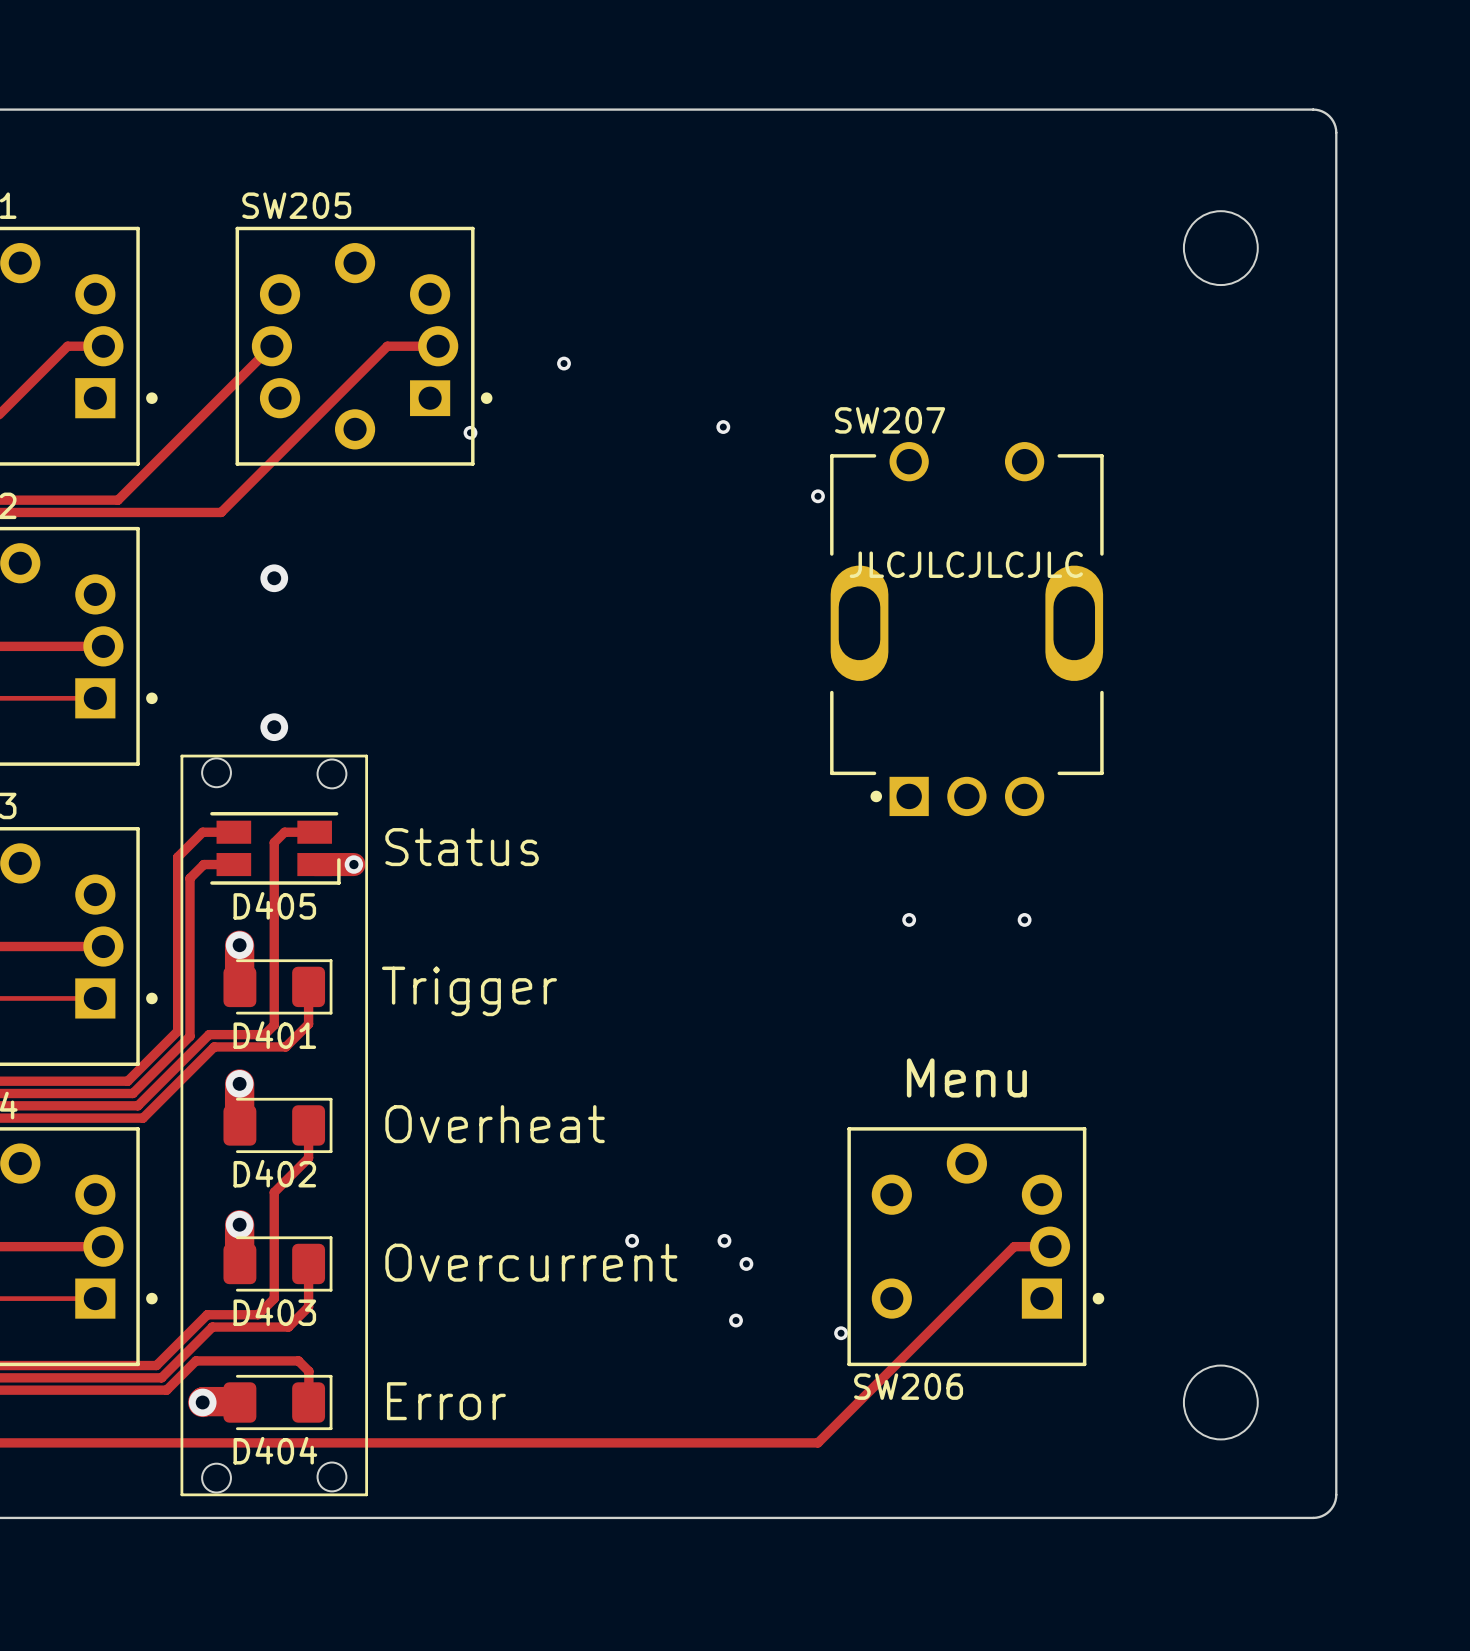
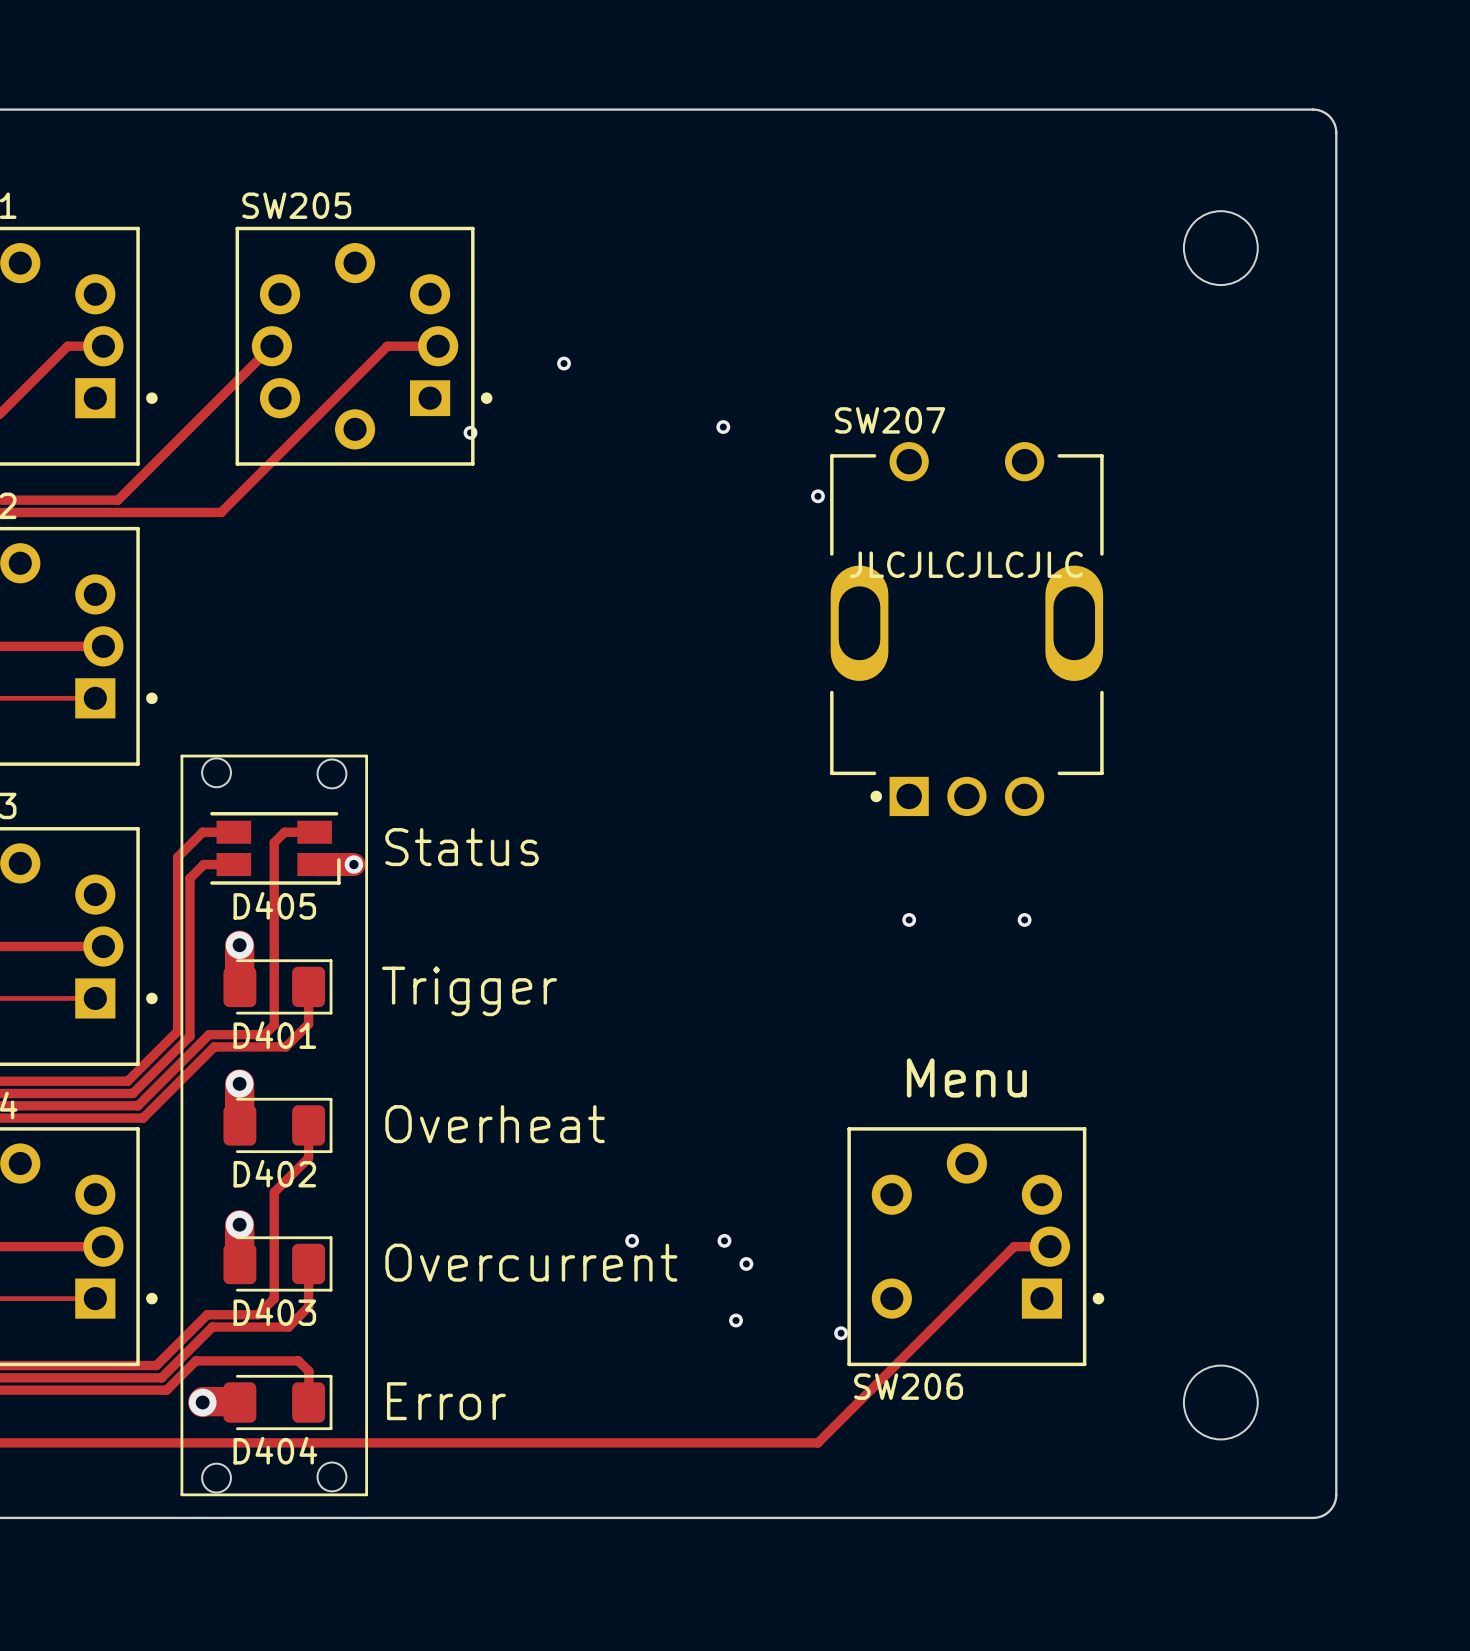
via: (274, 578) -> none
via: (274, 727) -> none

